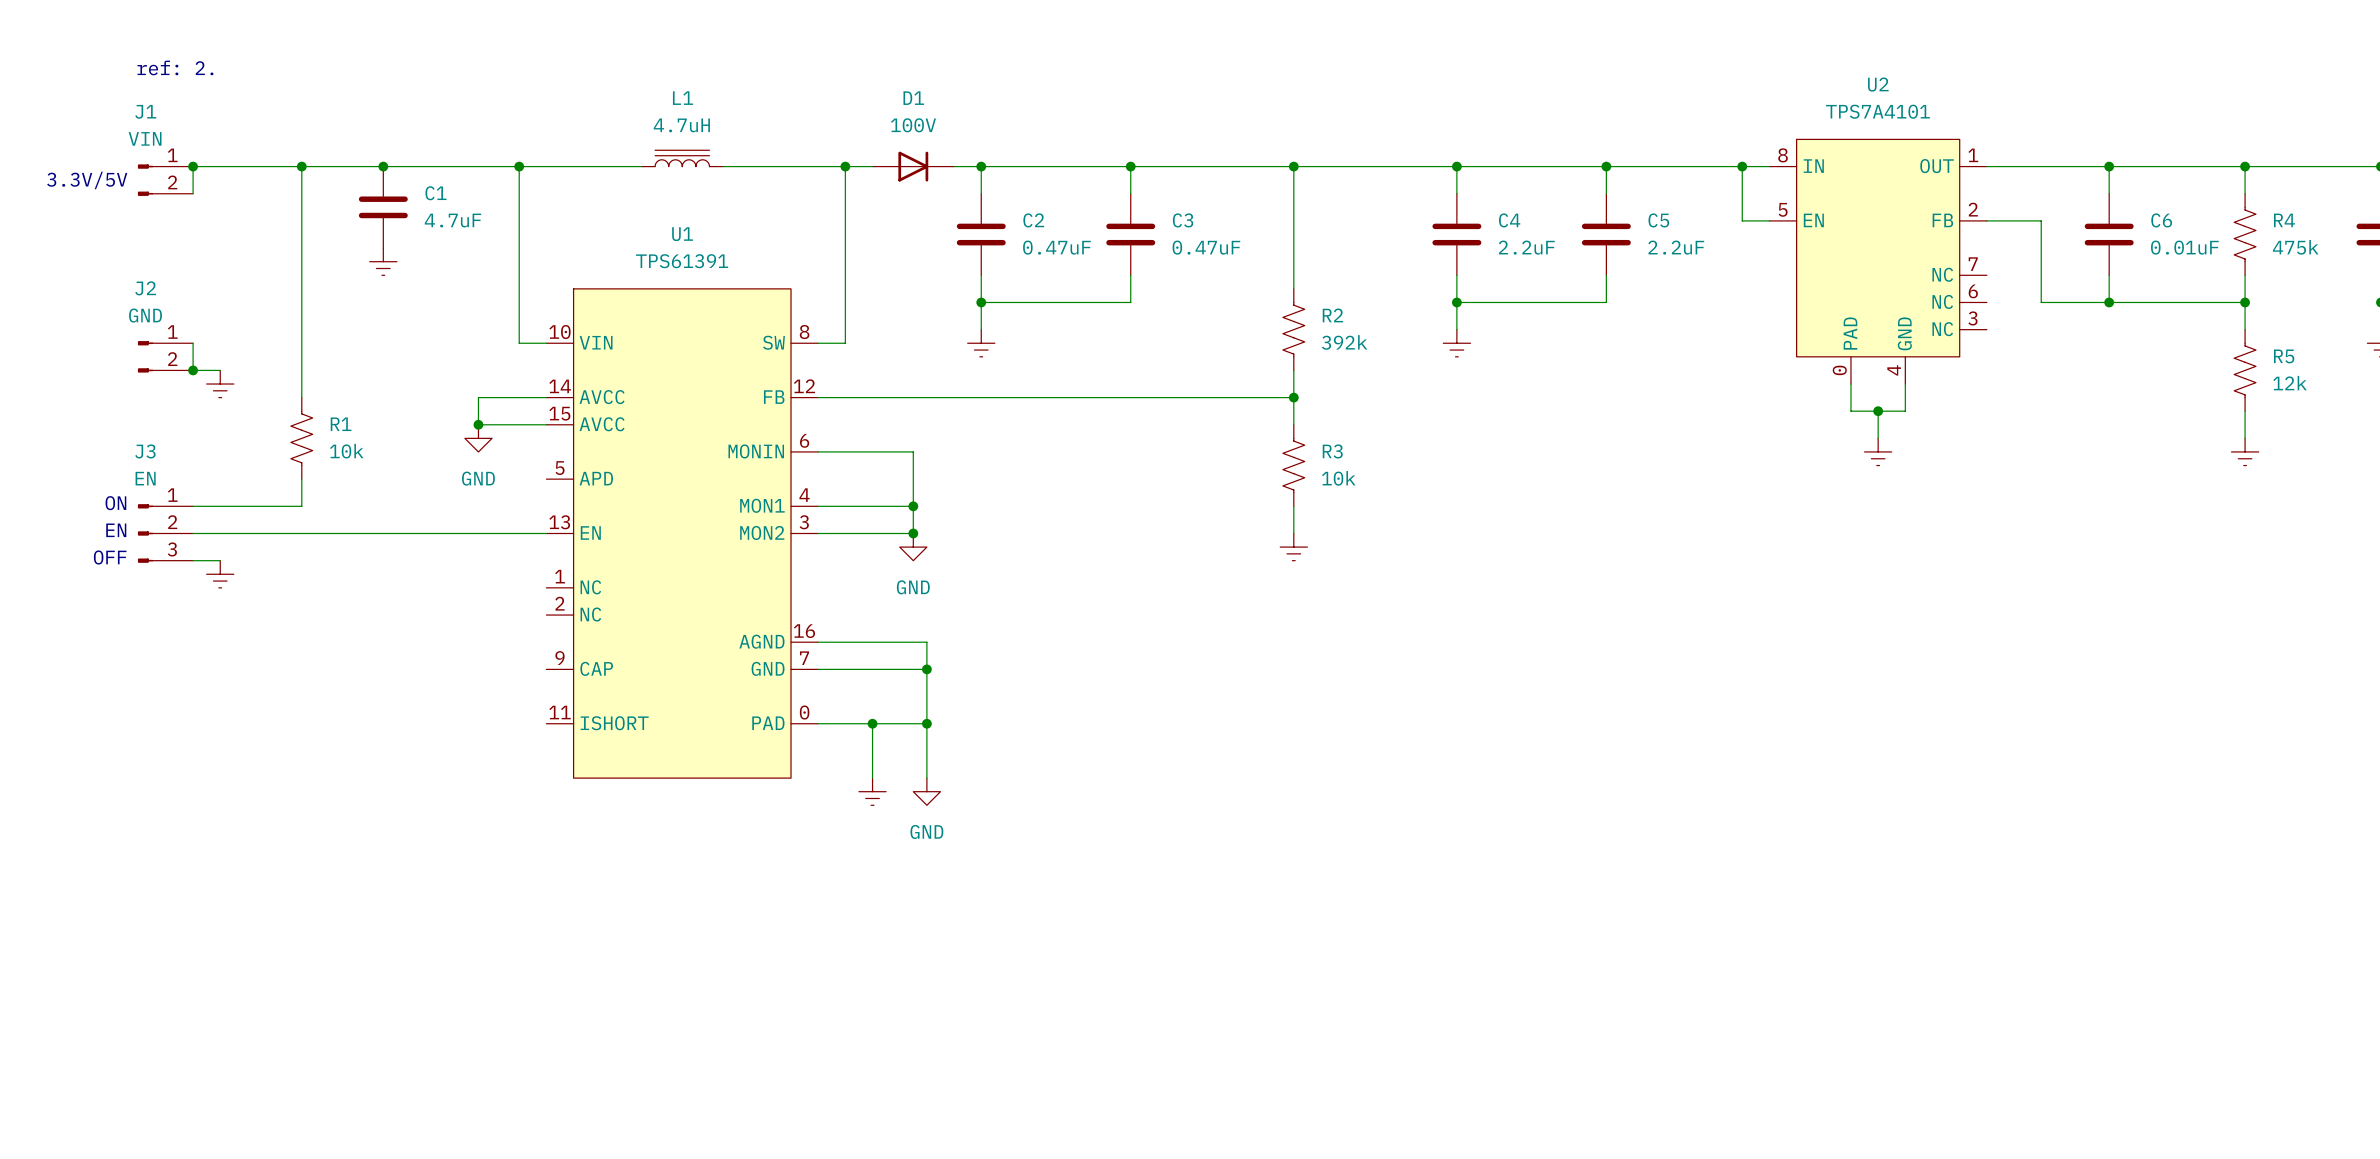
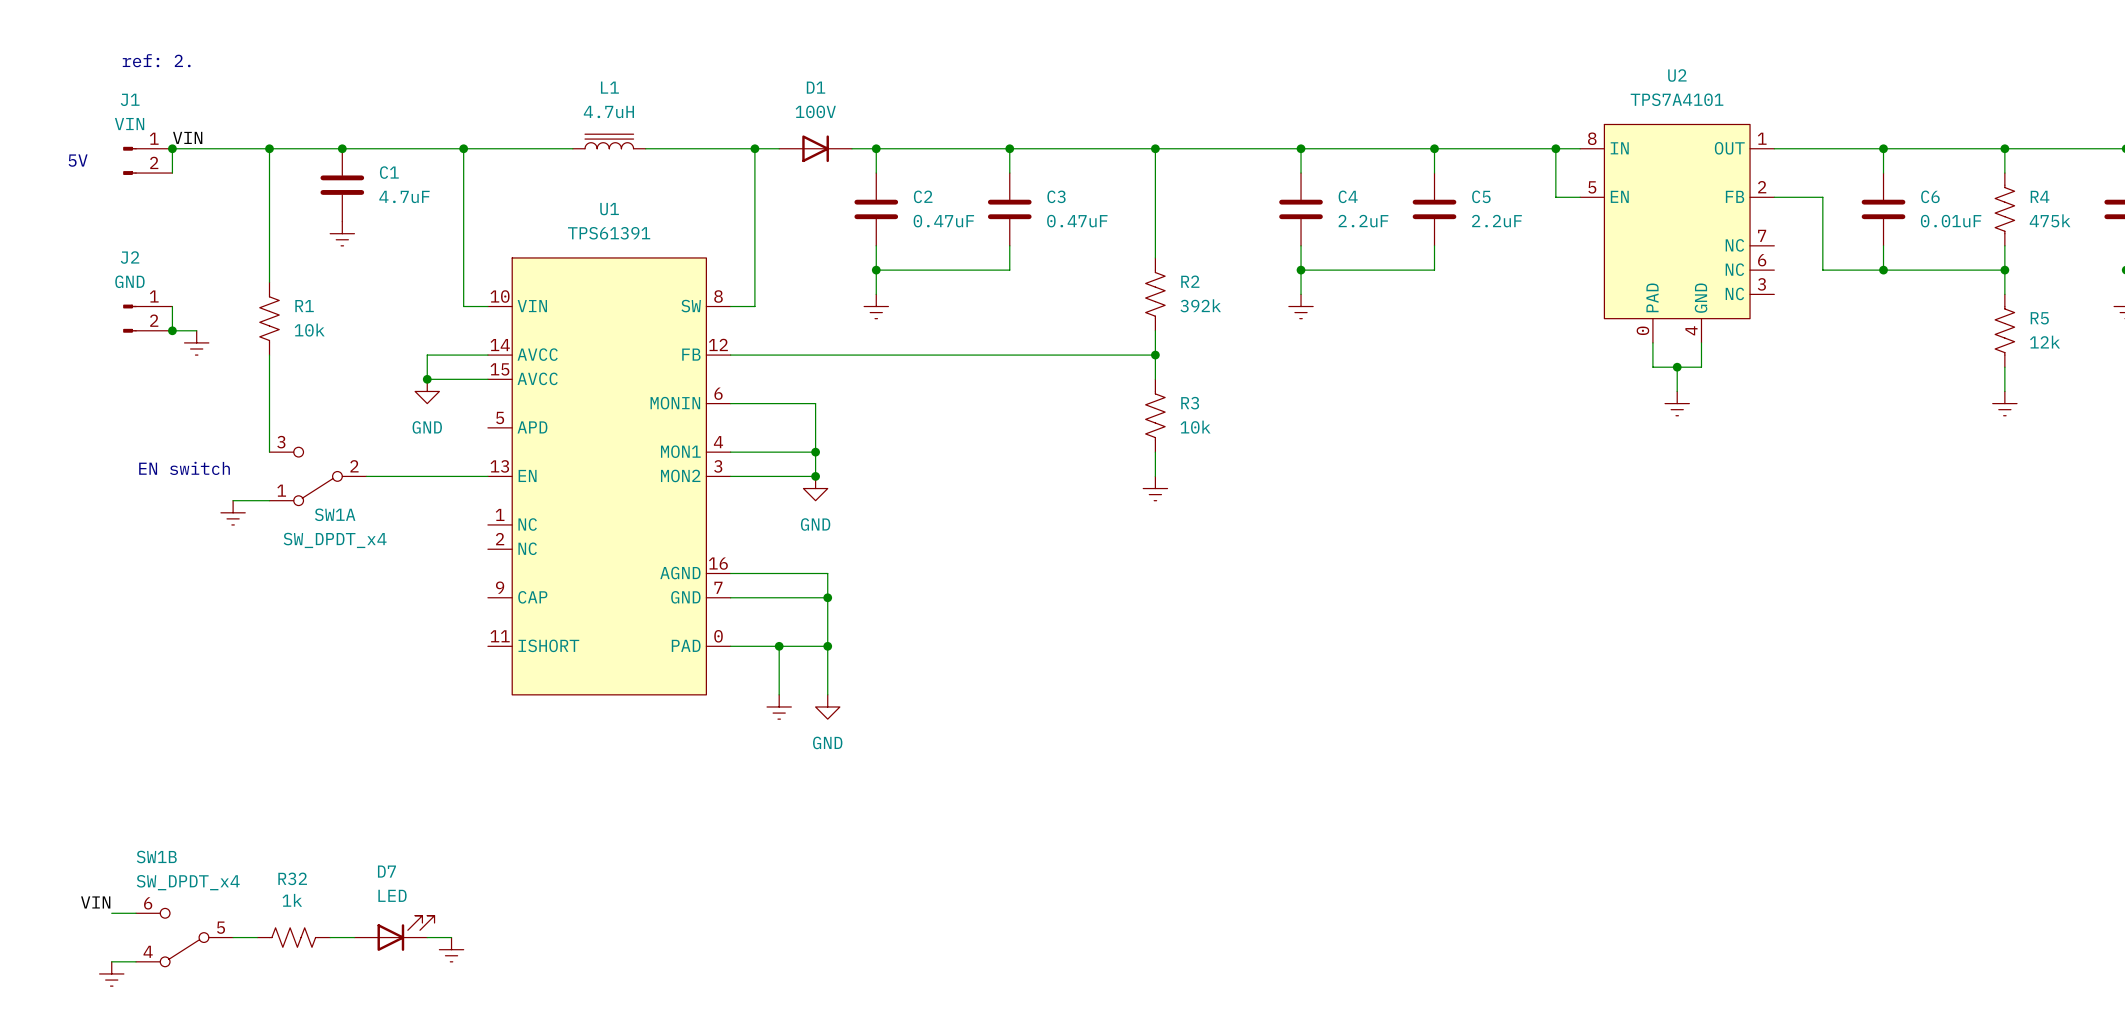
label: none -> VIN (187, 137)
text: 3.3V/5V (87, 180) -> 5V (78, 160)
R1 position: (301, 438) -> (269, 318)
text: ON (115, 503) -> none
wire: (193, 506) (301, 506) -> none
text: none -> EN switch (184, 468)
text: EN (116, 530) -> none
J3: EN (165, 533) -> none
wire: (193, 533) (410, 533) -> none
SW1A: none -> SW_DPDT_x4 (318, 476)
text: OFF (110, 557) -> none
wire: (193, 560) (220, 560) -> none
wire: none -> (233, 500) (269, 500)
power symbol position: (220, 574) -> (233, 512)
label: none -> VIN (95, 902)
wire: none -> (111, 913) (136, 913)
D7: none -> LED (394, 933)
SW1B: none -> SW_DPDT_x4 (184, 937)
wire: none -> (233, 937) (257, 937)
R32: none -> 1k (293, 937)
wire: none -> (330, 937) (354, 937)
wire: none -> (427, 937) (451, 937)
power symbol: none -> (451, 949)
wire: none -> (111, 961) (136, 961)
power symbol: none -> (111, 973)

